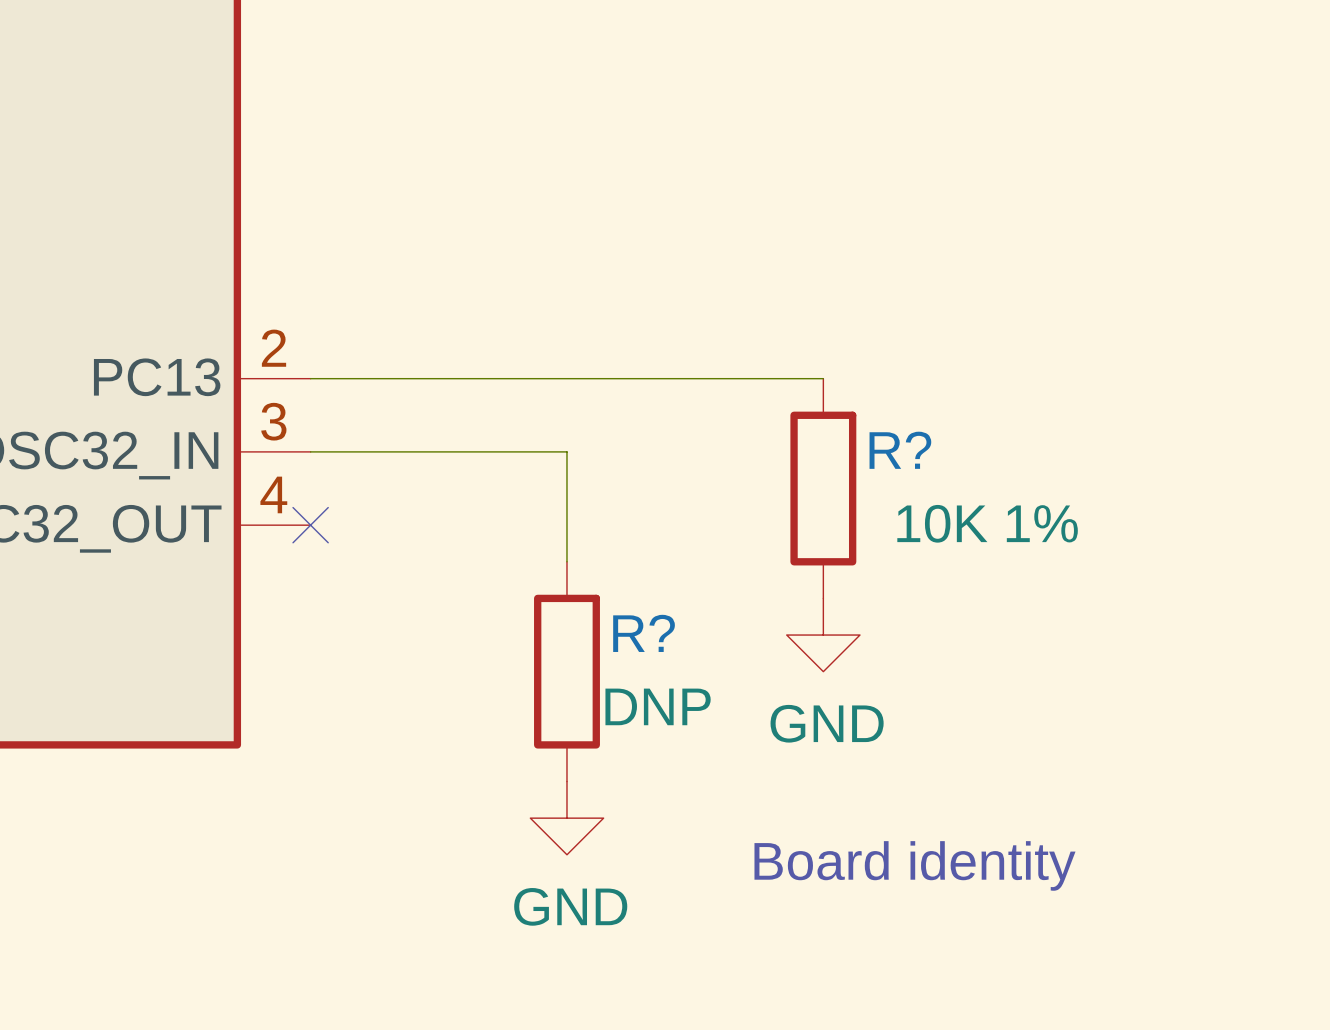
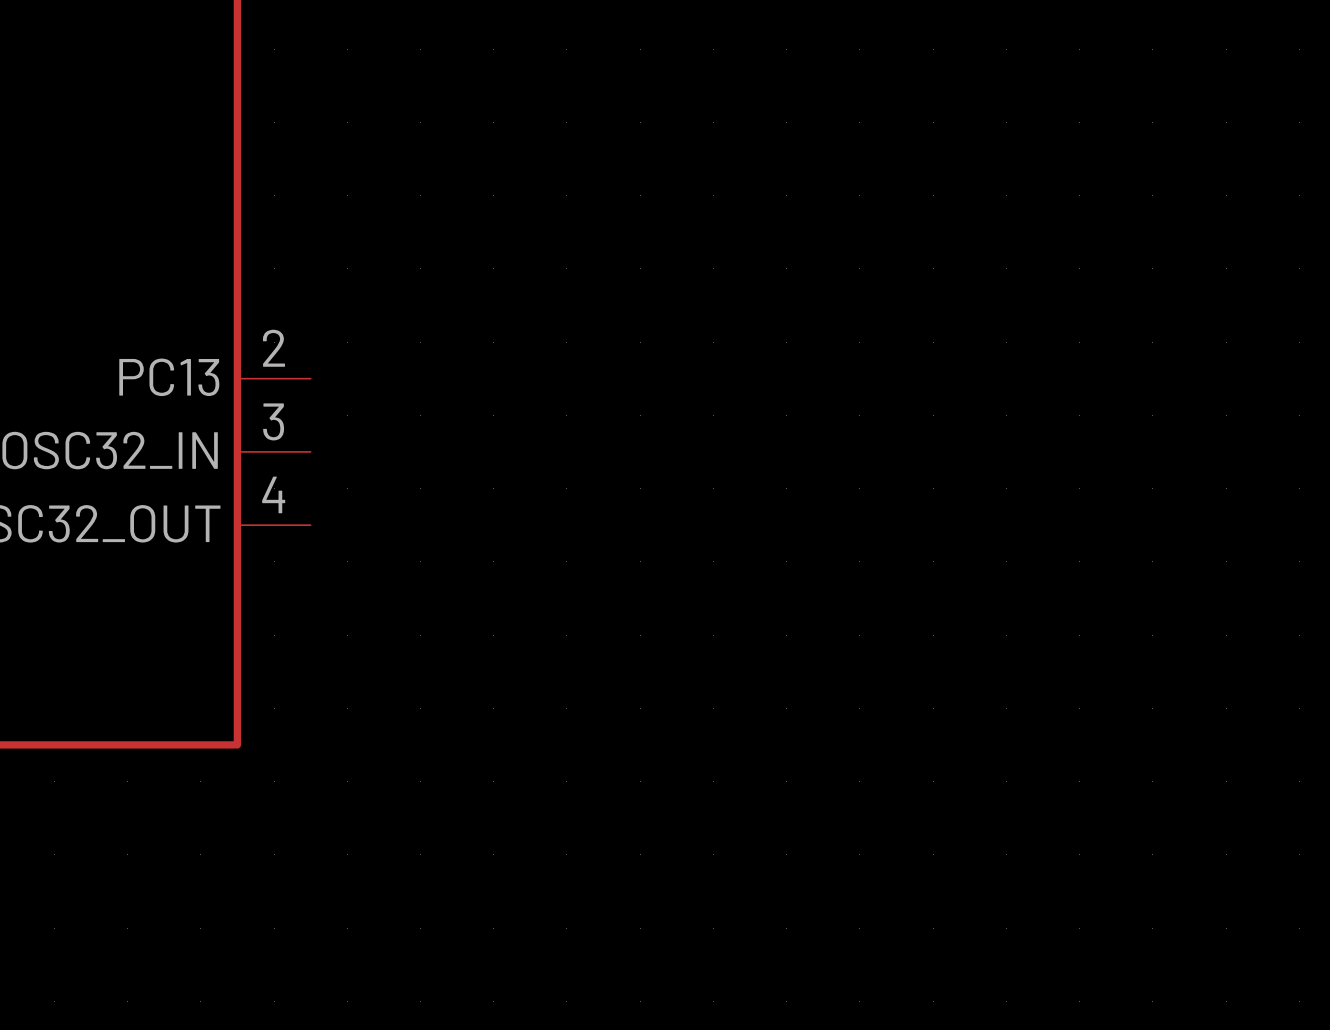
wire: (310, 378) (823, 378) -> none
wire: (310, 451) (566, 451) (566, 561) -> none
R?: 10K 1% (823, 488) -> none
no-connect mark: (310, 525) -> none
power symbol: GND (823, 635) -> none
R?: DNP (566, 671) -> none
power symbol: GND (566, 818) -> none
text: Board identity (914, 865) -> none

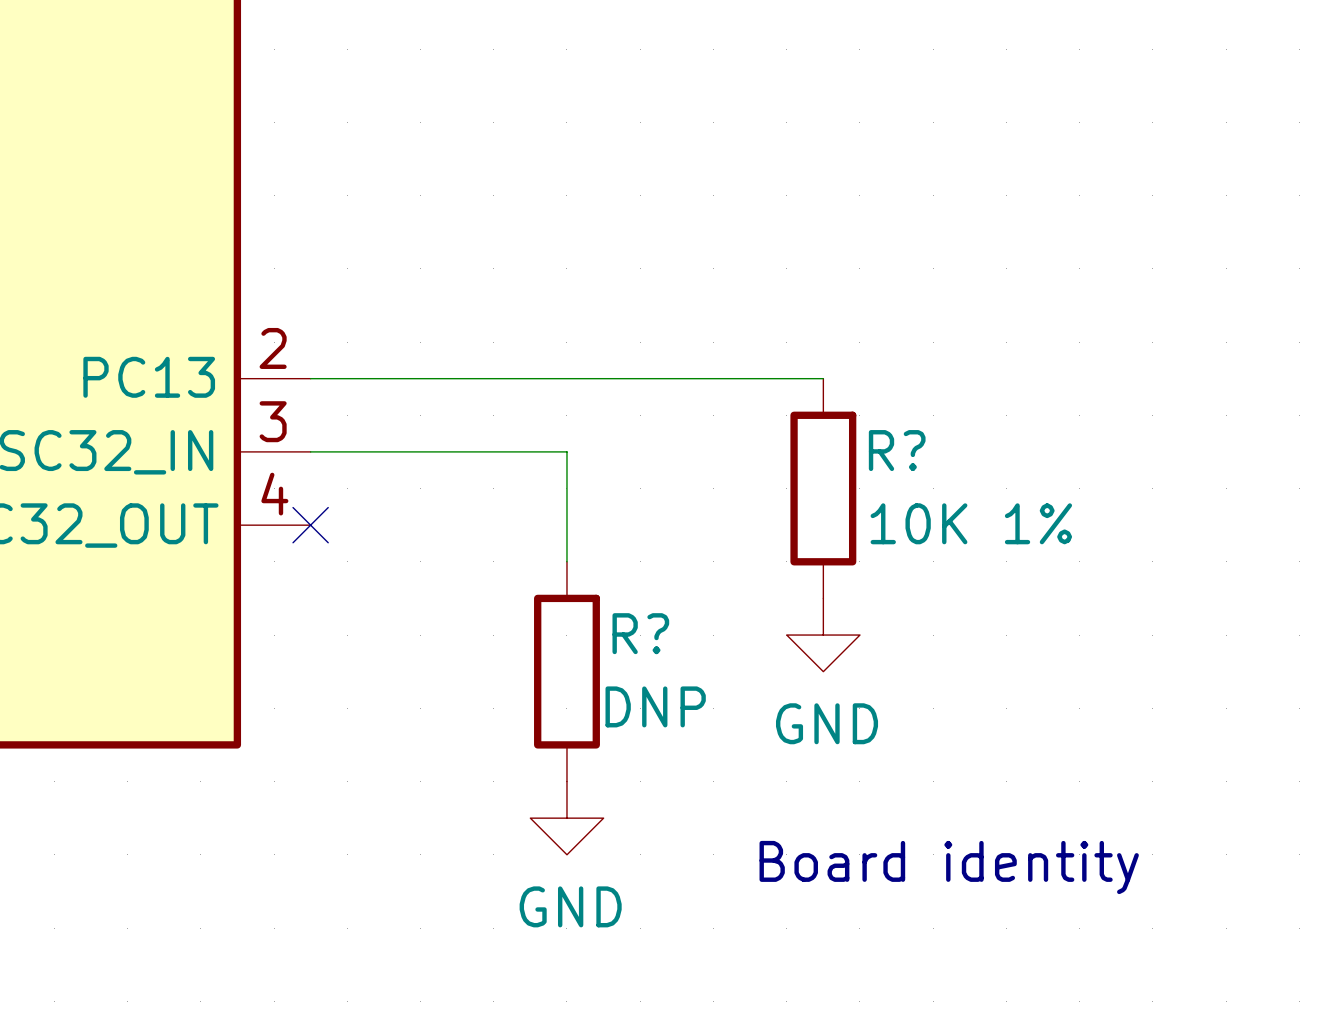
wire: none -> (310, 378) (823, 378)
wire: none -> (310, 451) (566, 451) (566, 561)
R?: none -> 10K 1% (823, 488)
no-connect mark: none -> (310, 525)
power symbol: none -> GND (823, 635)
R?: none -> DNP (566, 671)
power symbol: none -> GND (566, 818)
text: none -> Board identity (949, 867)

